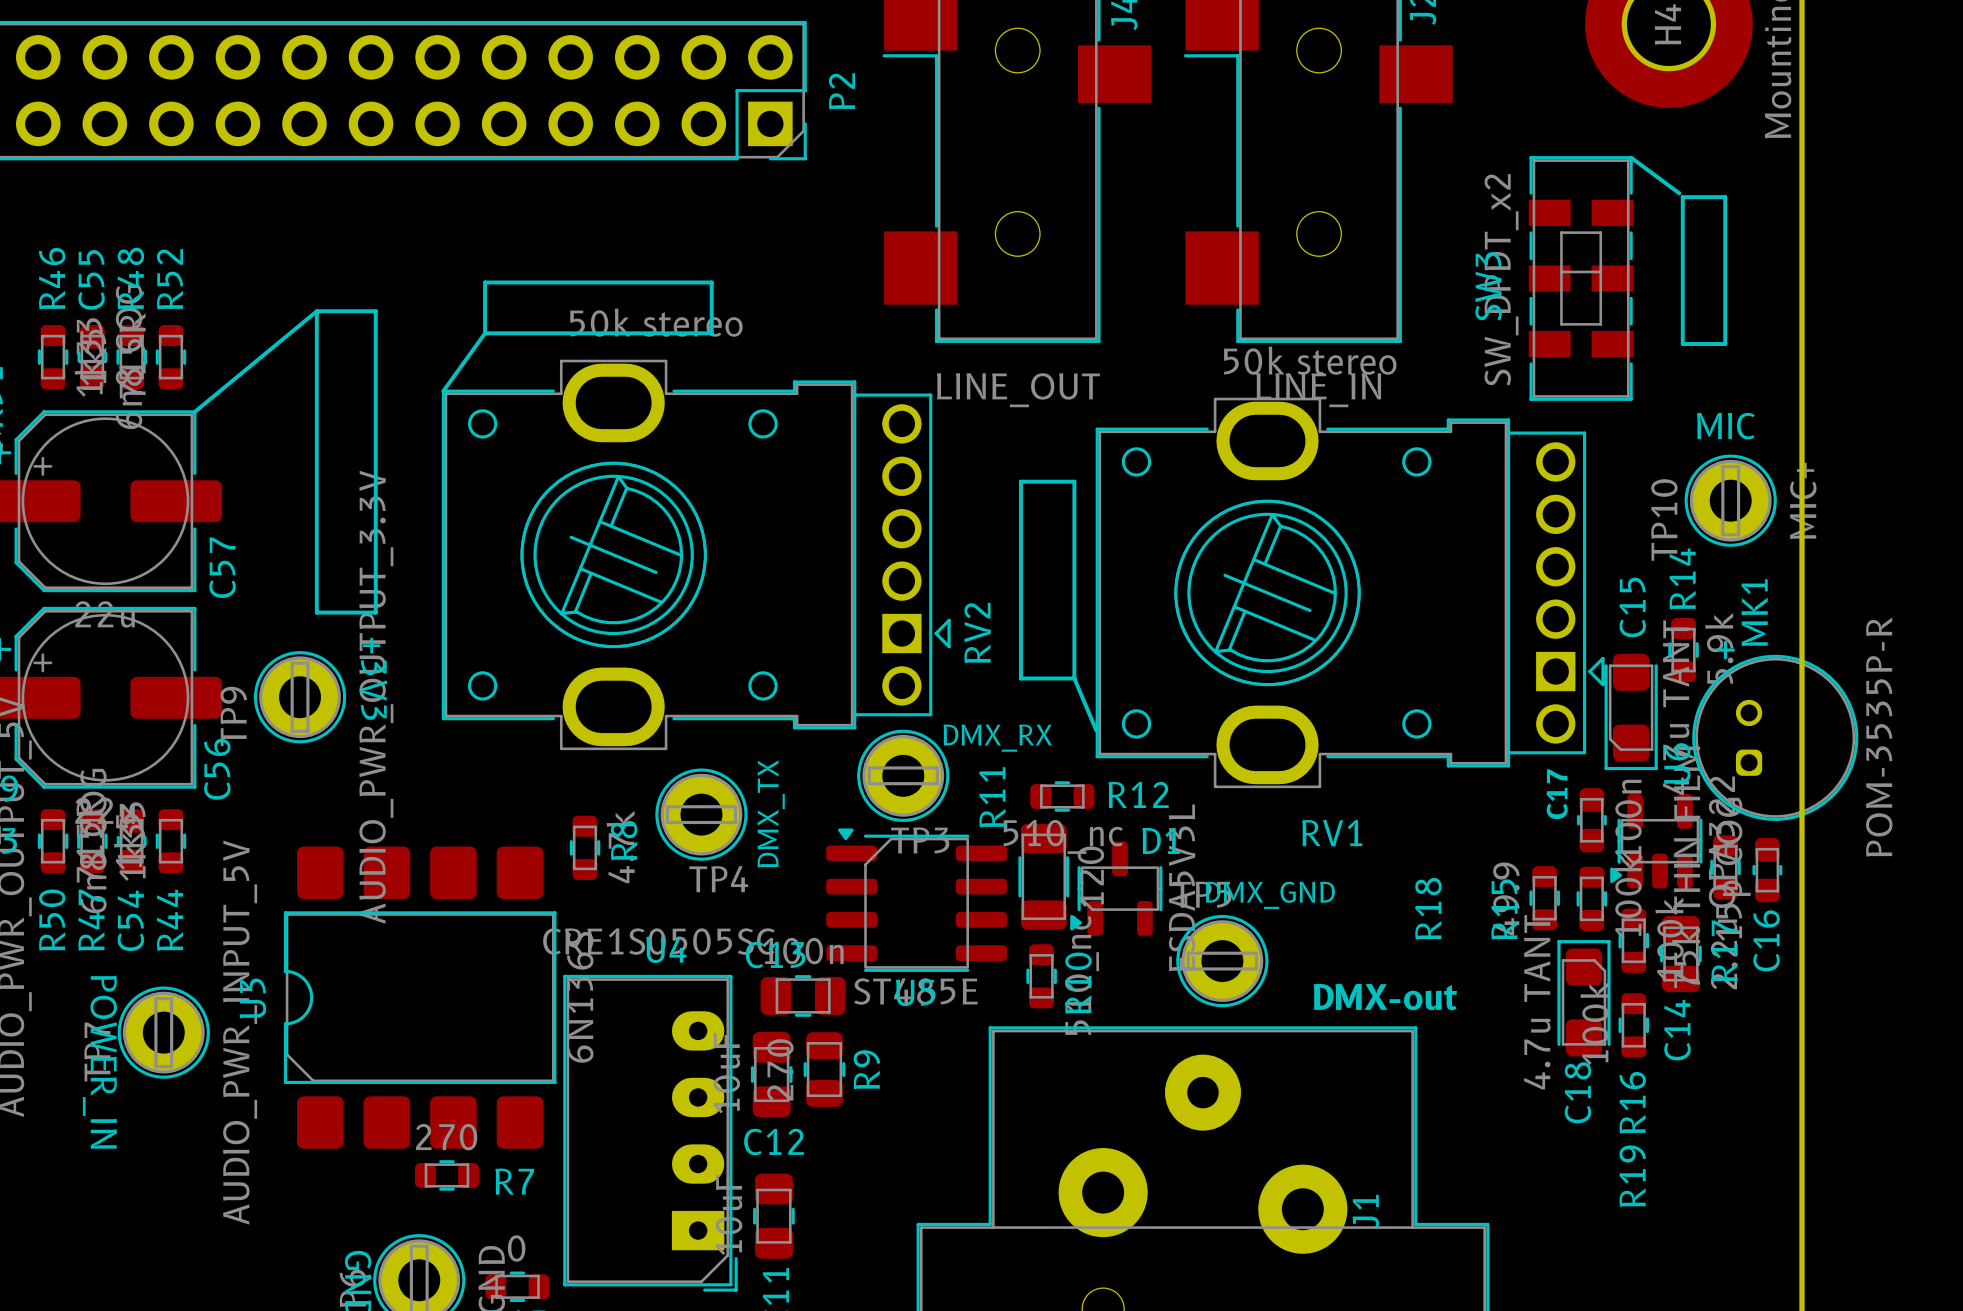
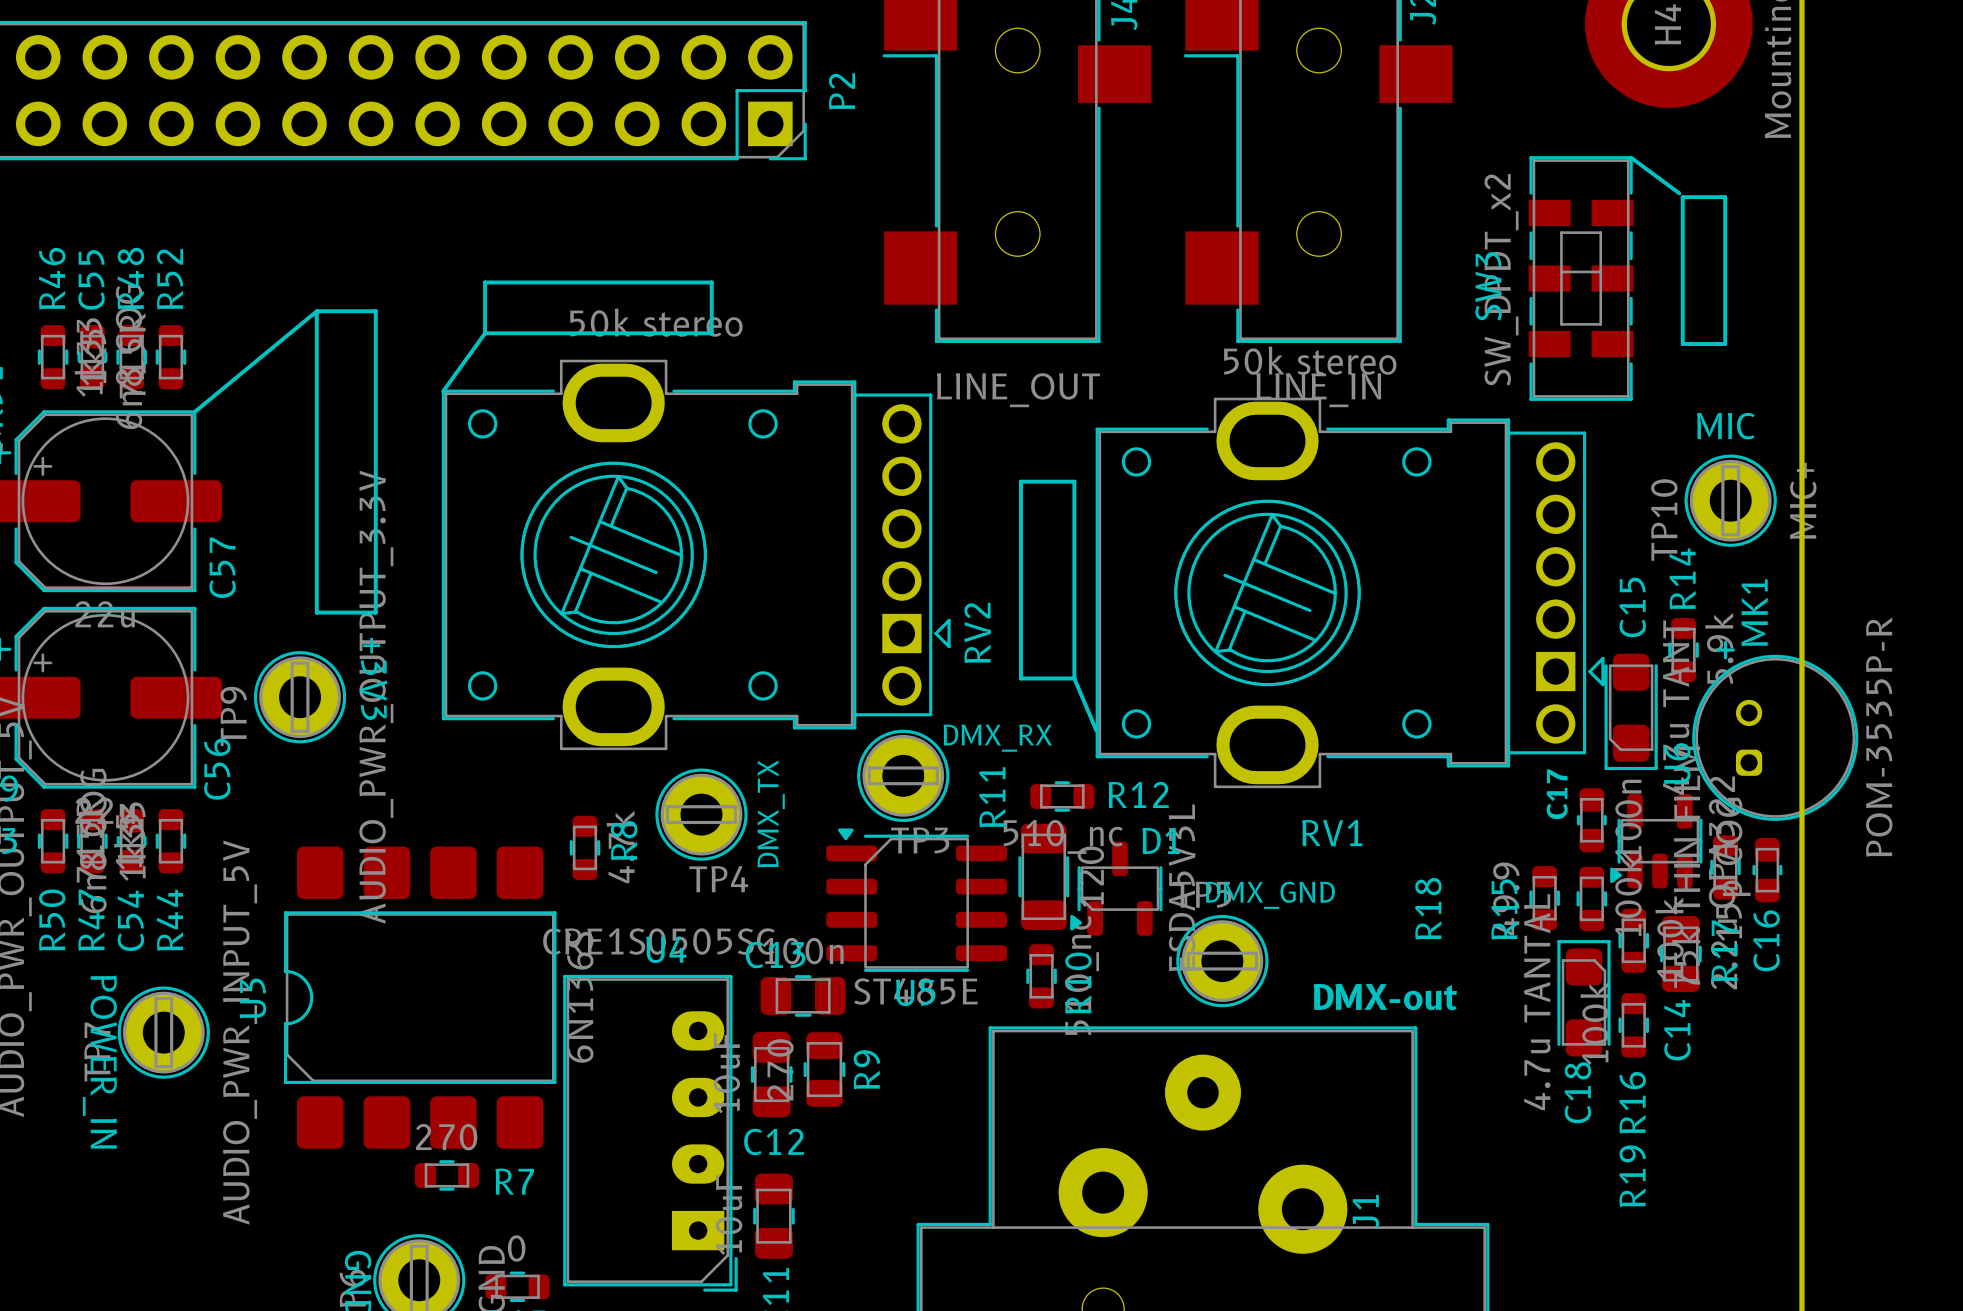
C18 value: 4.7u TANT (1537, 1002) -> 4.7u TANTAL (1537, 1002)

